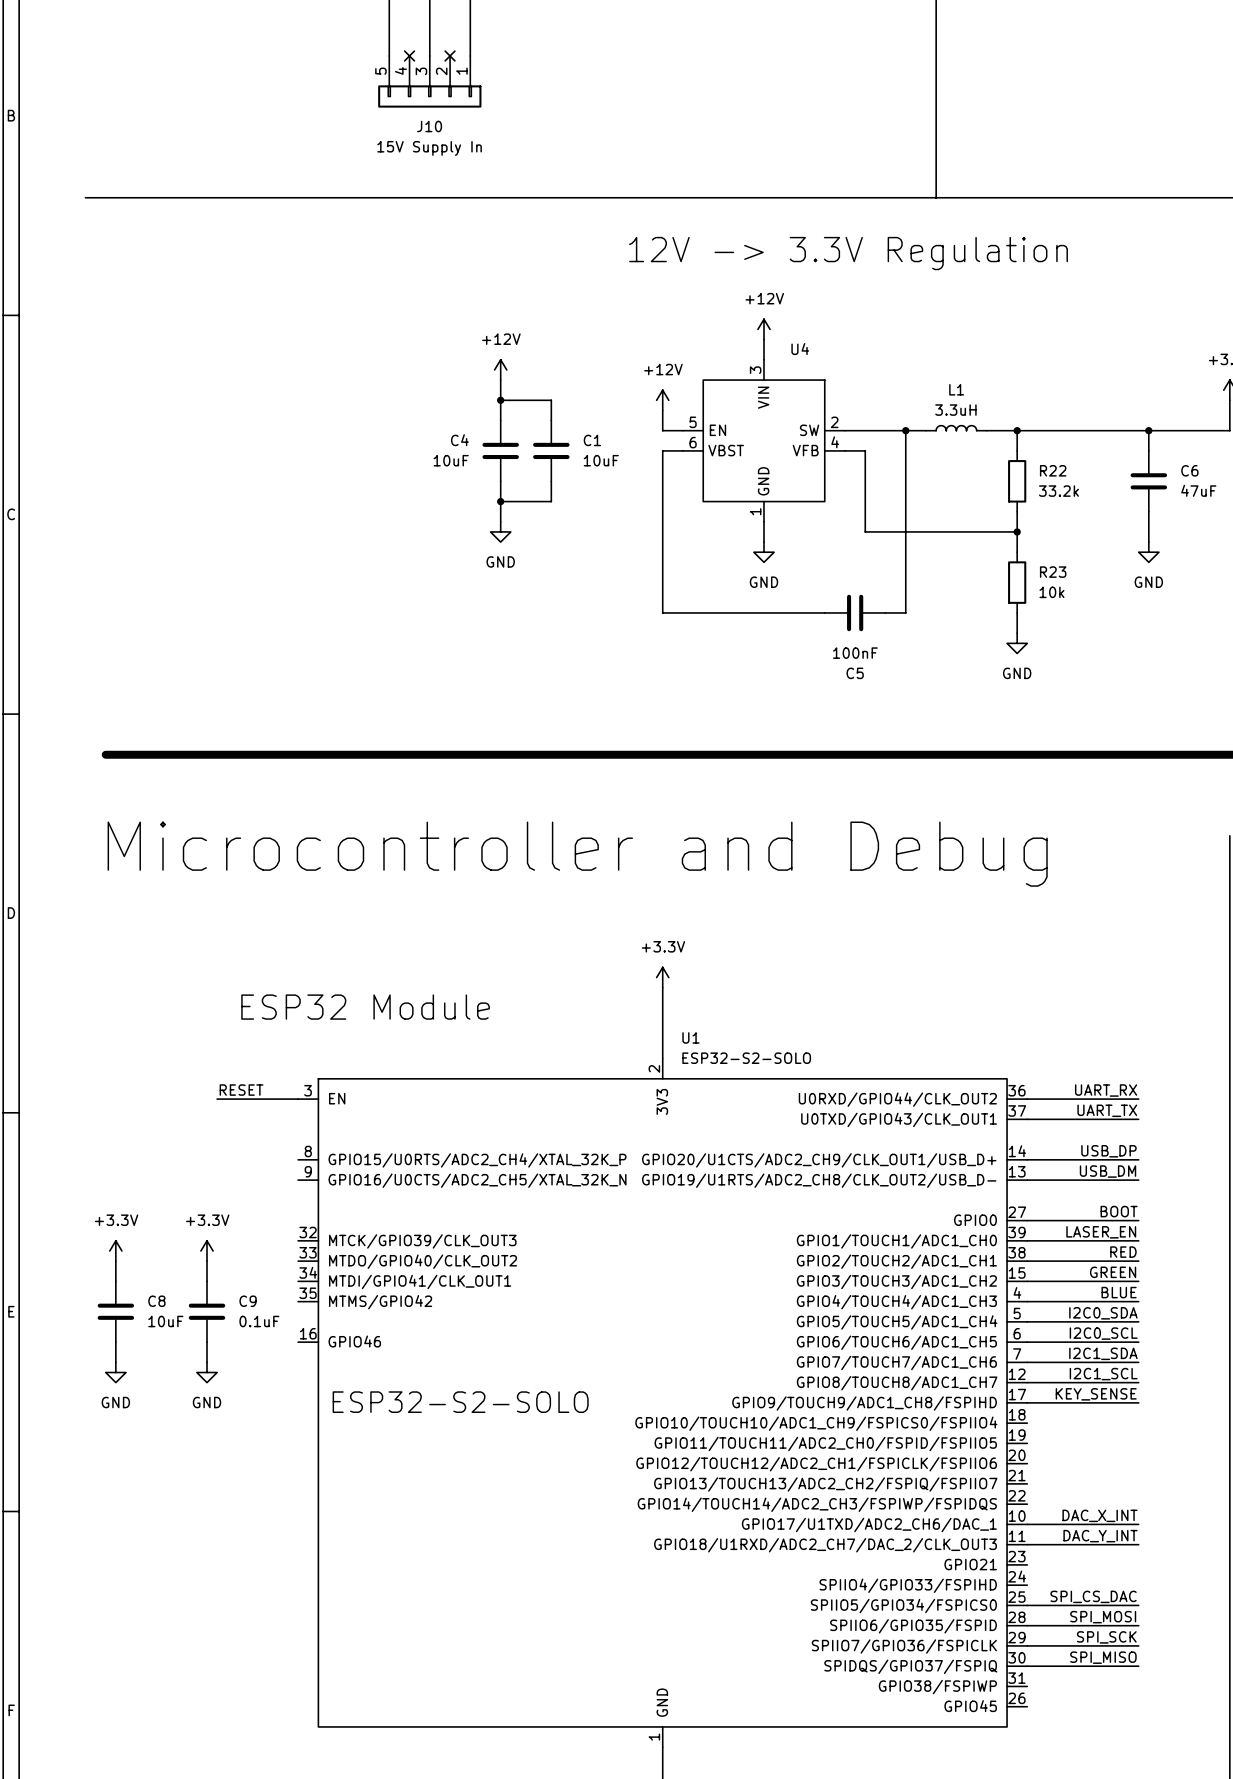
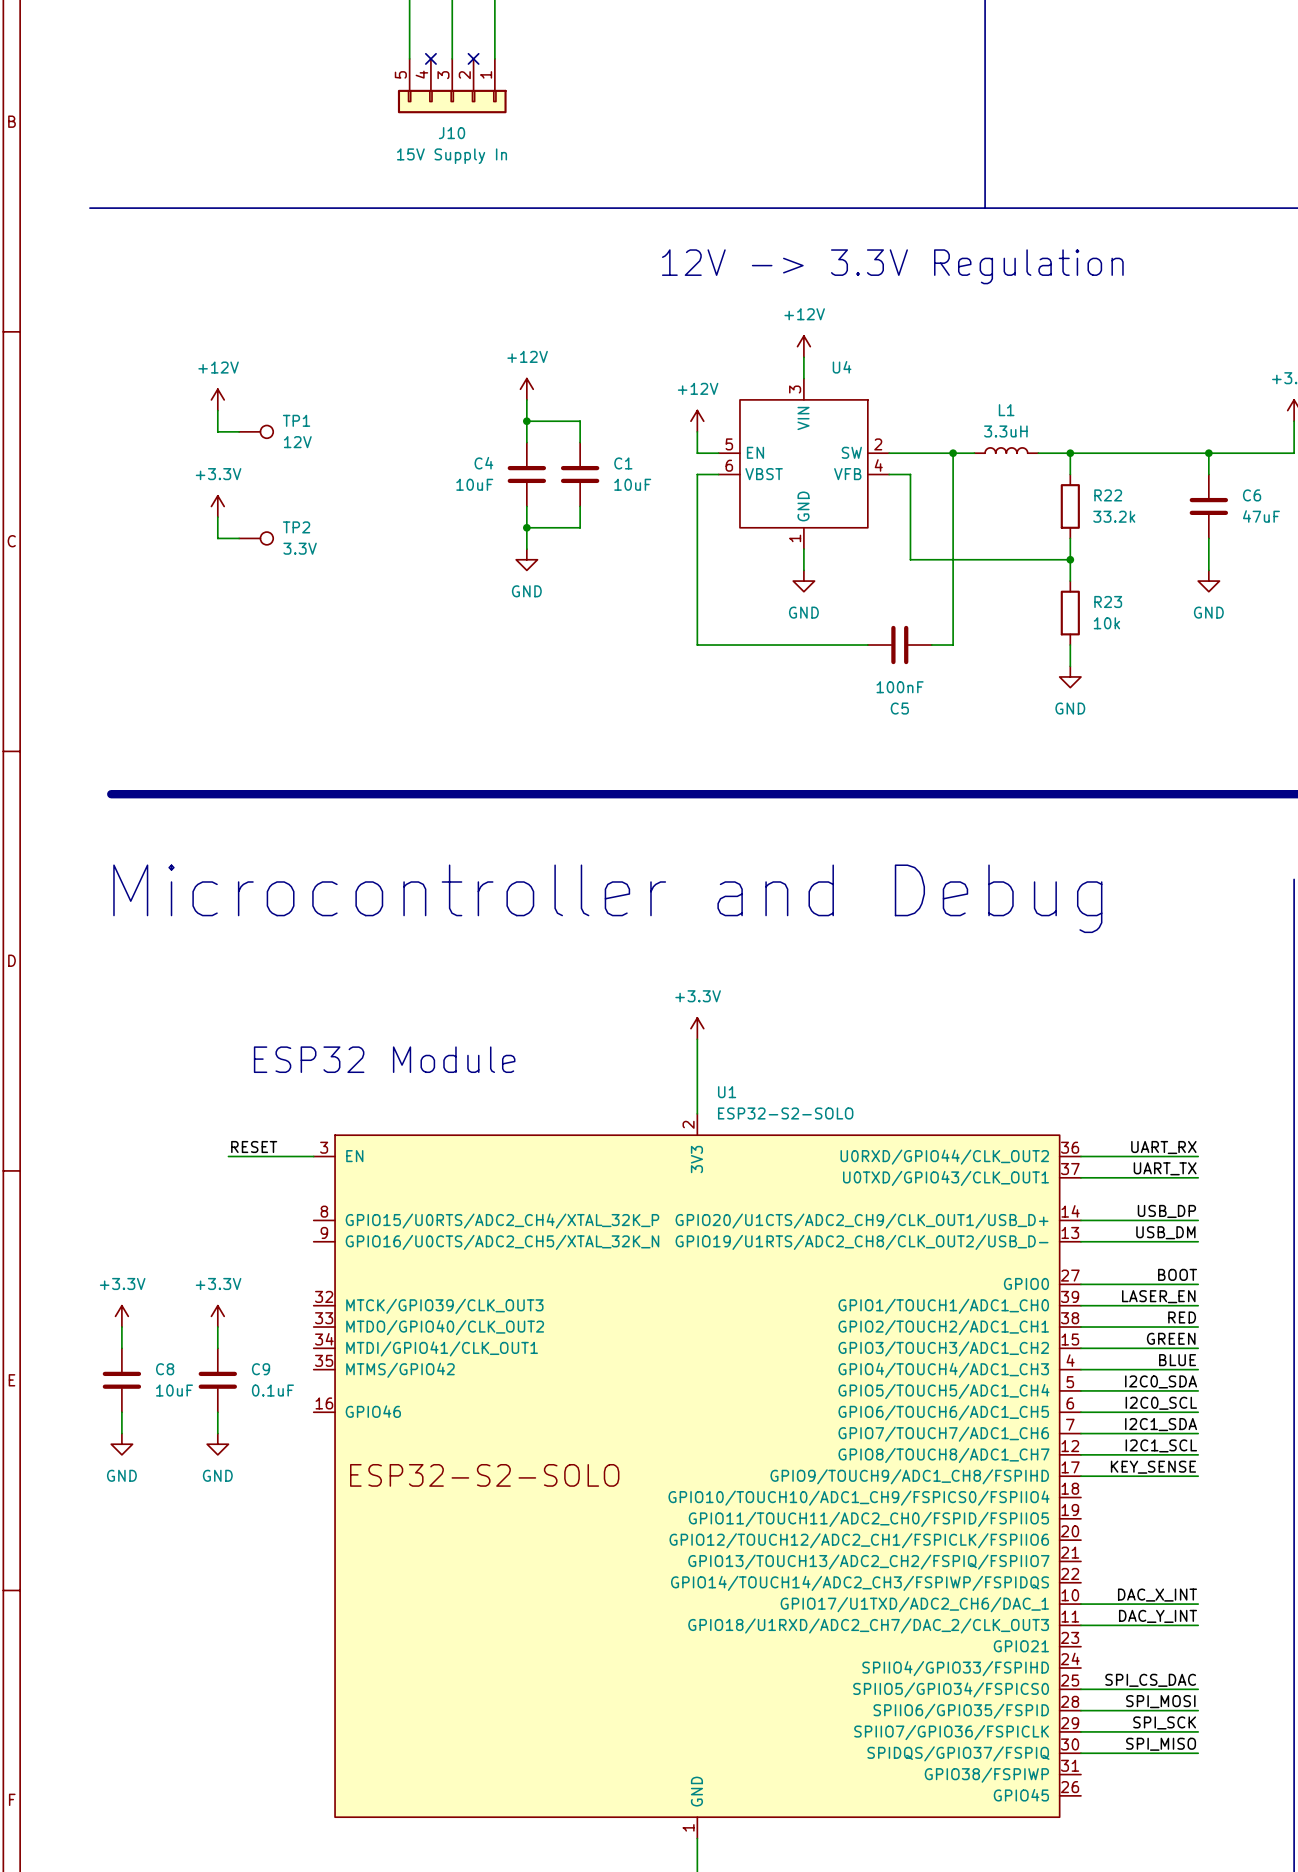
power symbol: none -> +12V (217, 399)
wire: none -> (217, 410) (217, 431) (239, 431)
TP1: none -> 12V (256, 431)
power symbol: none -> +3.3V (217, 506)
wire: none -> (217, 517) (217, 538) (239, 538)
TP2: none -> 3.3V (256, 538)

